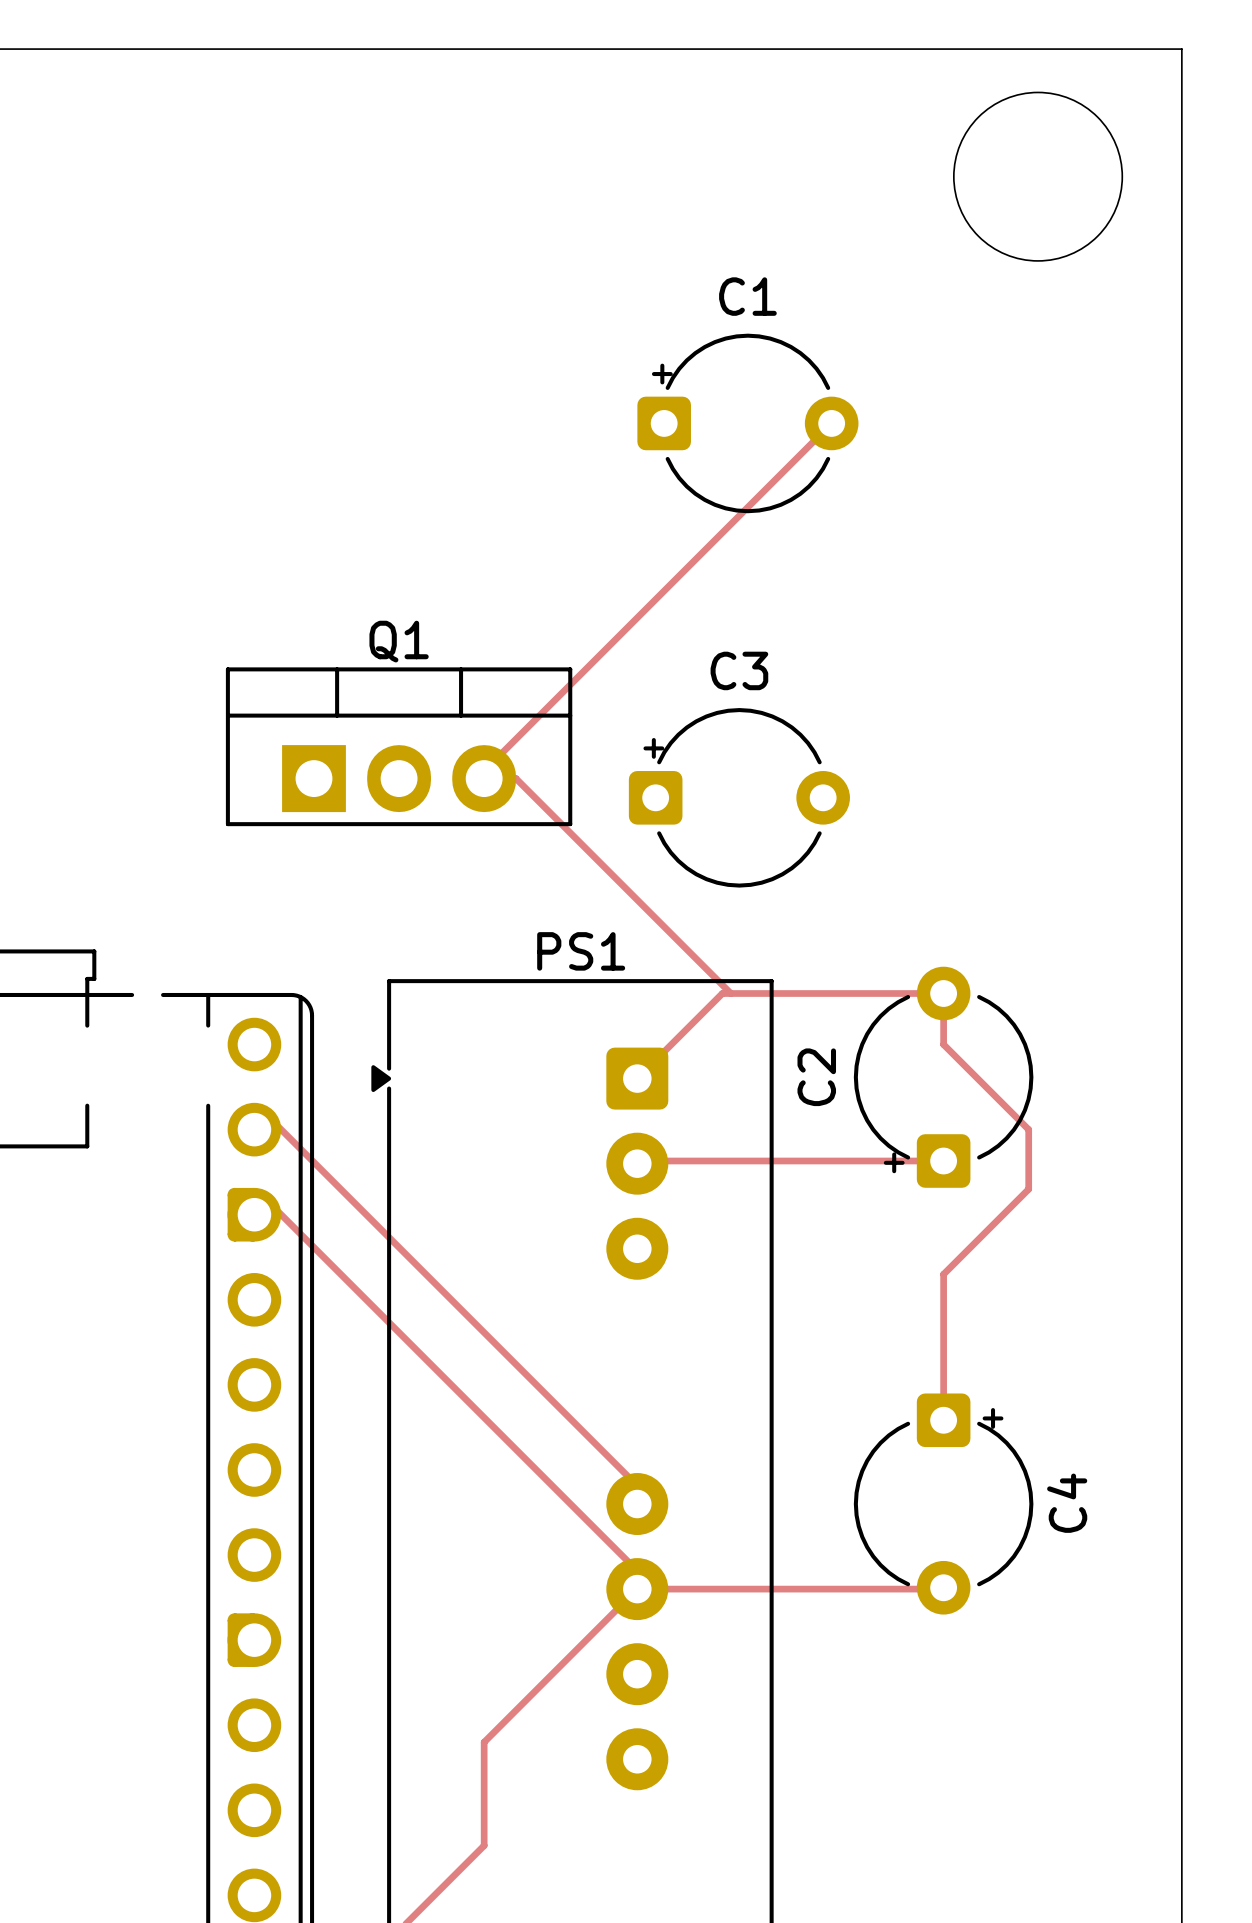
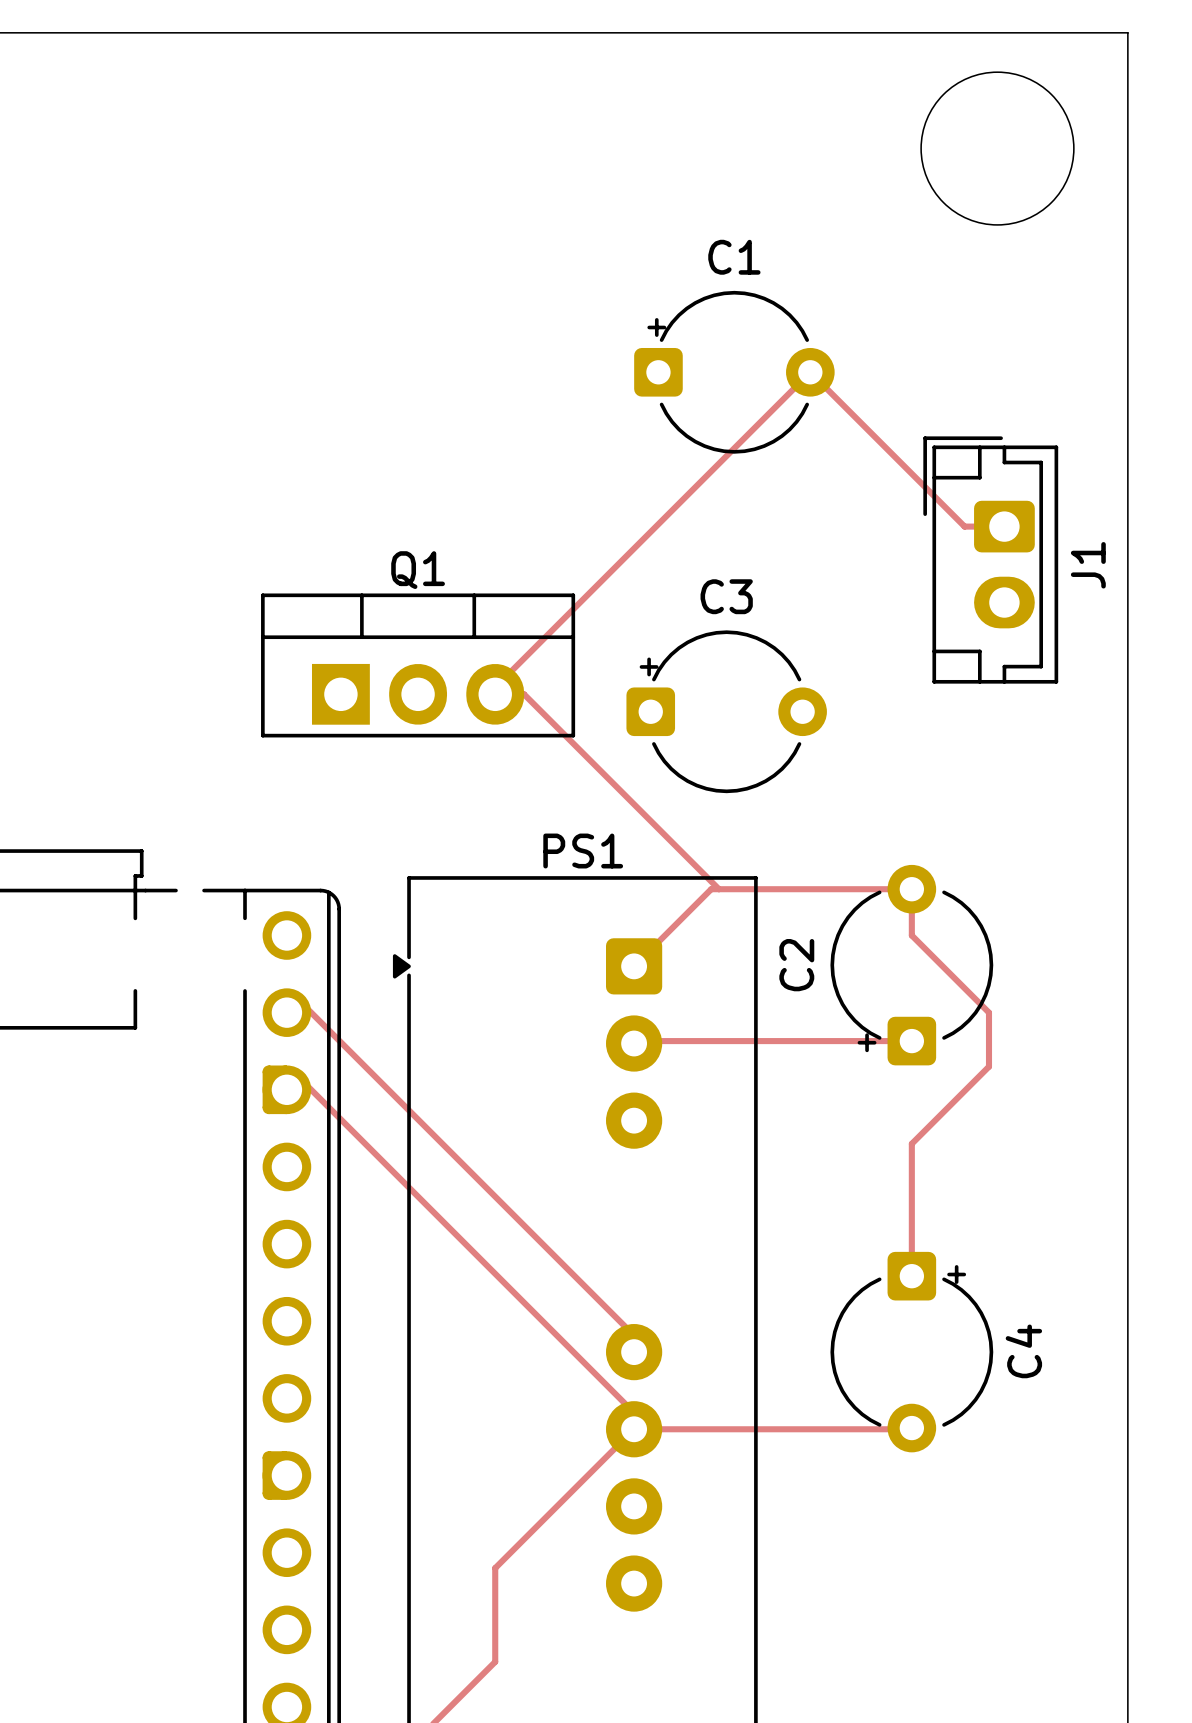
track: none -> (810, 372) (964, 526) (1004, 526)
J1: none -> (990, 560)

